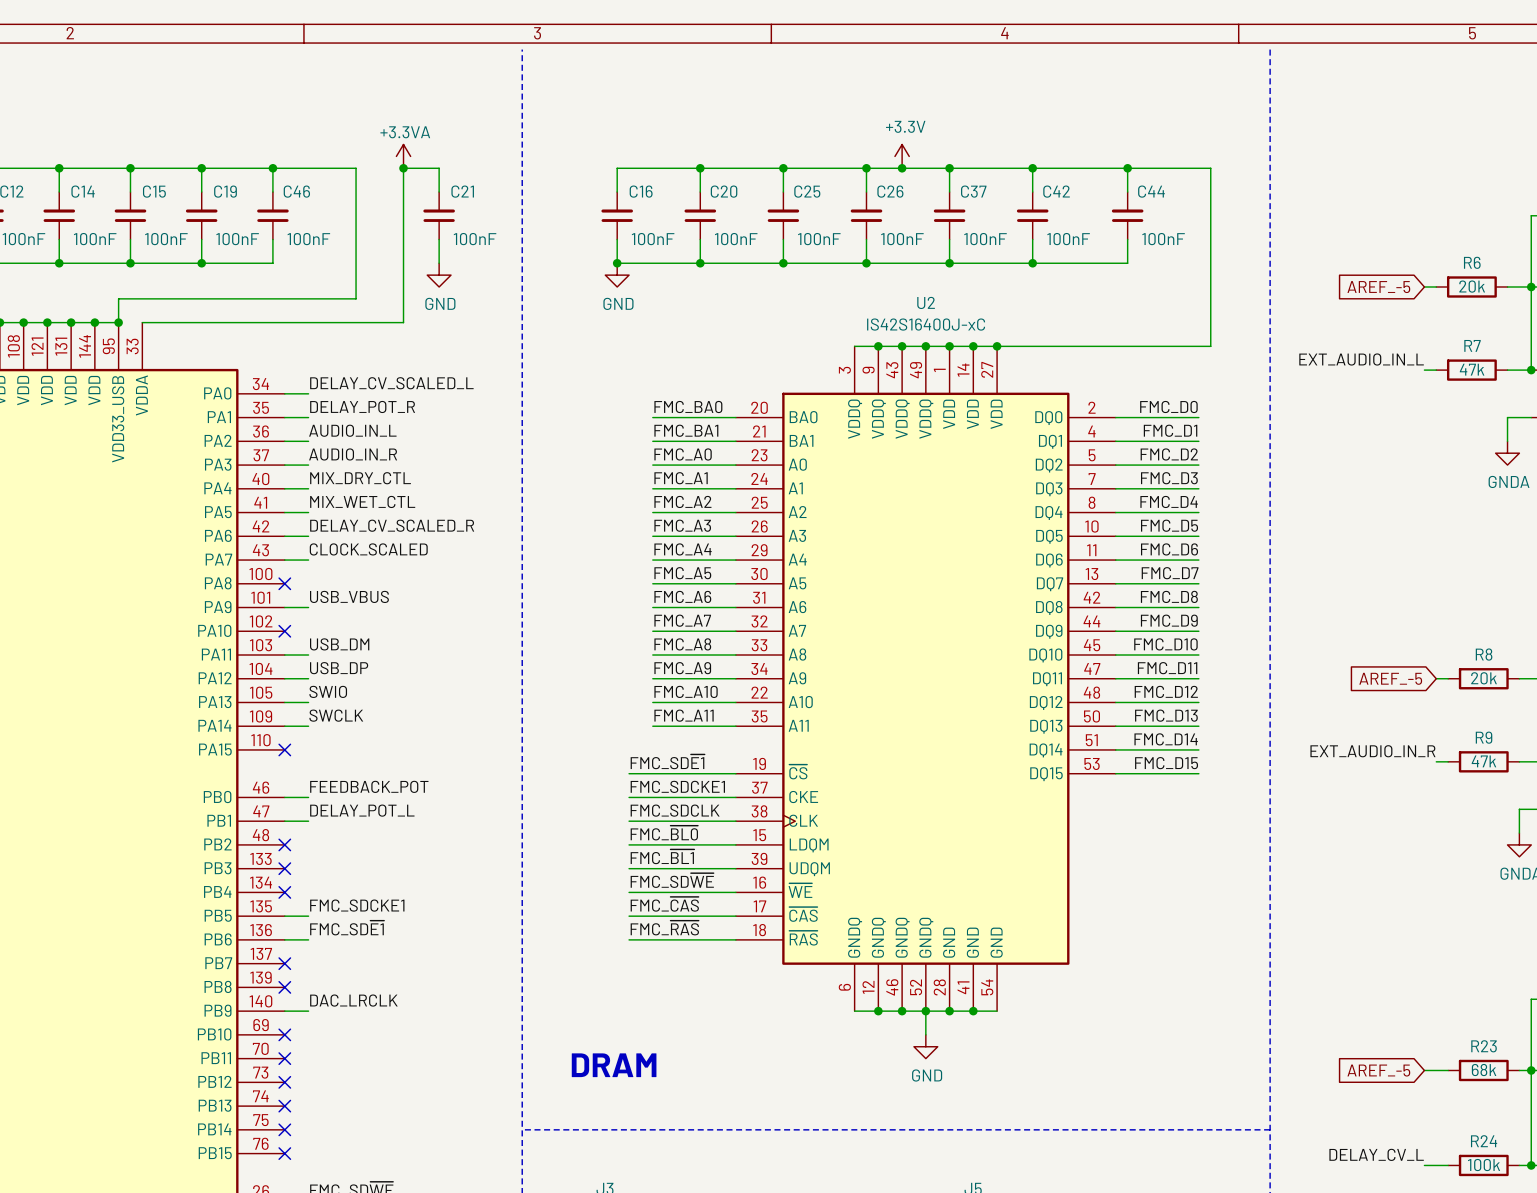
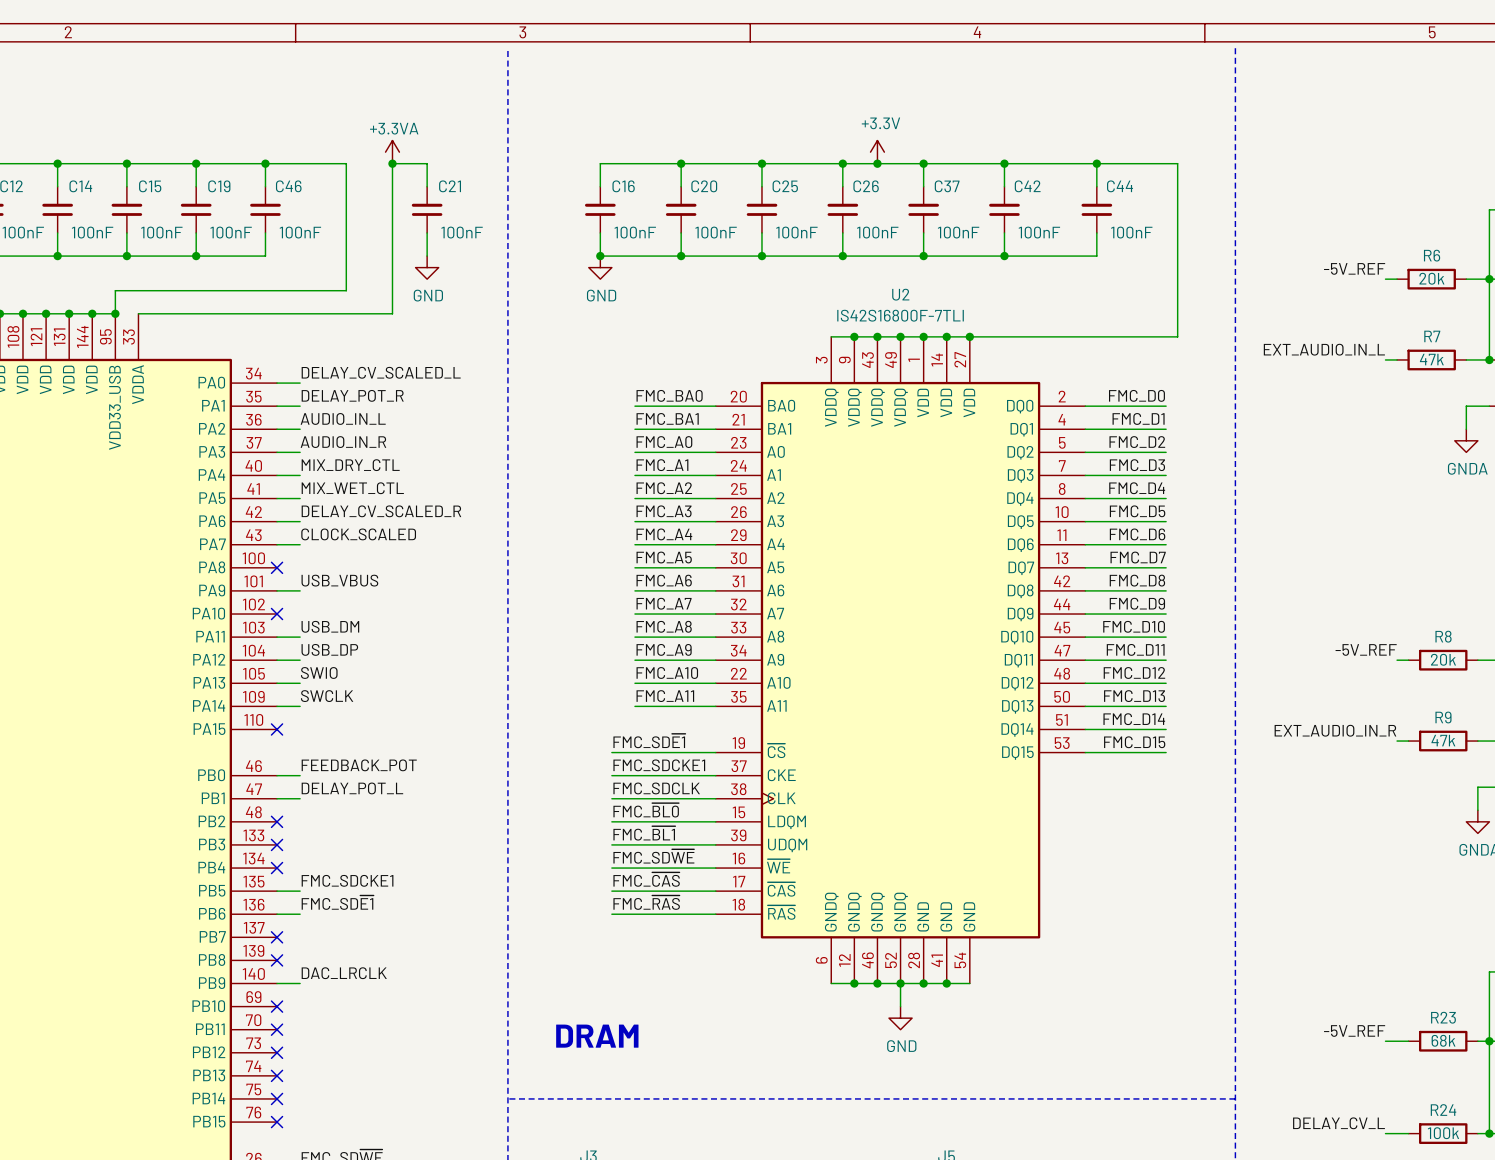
label: none -> -5V_REF (1354, 268)
global label: AREF_-5 (1378, 287) -> none
U2 value: IS42S16400J-xC (926, 324) -> IS42S16800F-7TLI (900, 315)
label: none -> -5V_REF (1366, 649)
global label: AREF_-5 (1390, 678) -> none
label: none -> -5V_REF (1354, 1030)
global label: AREF_-5 (1378, 1070) -> none

